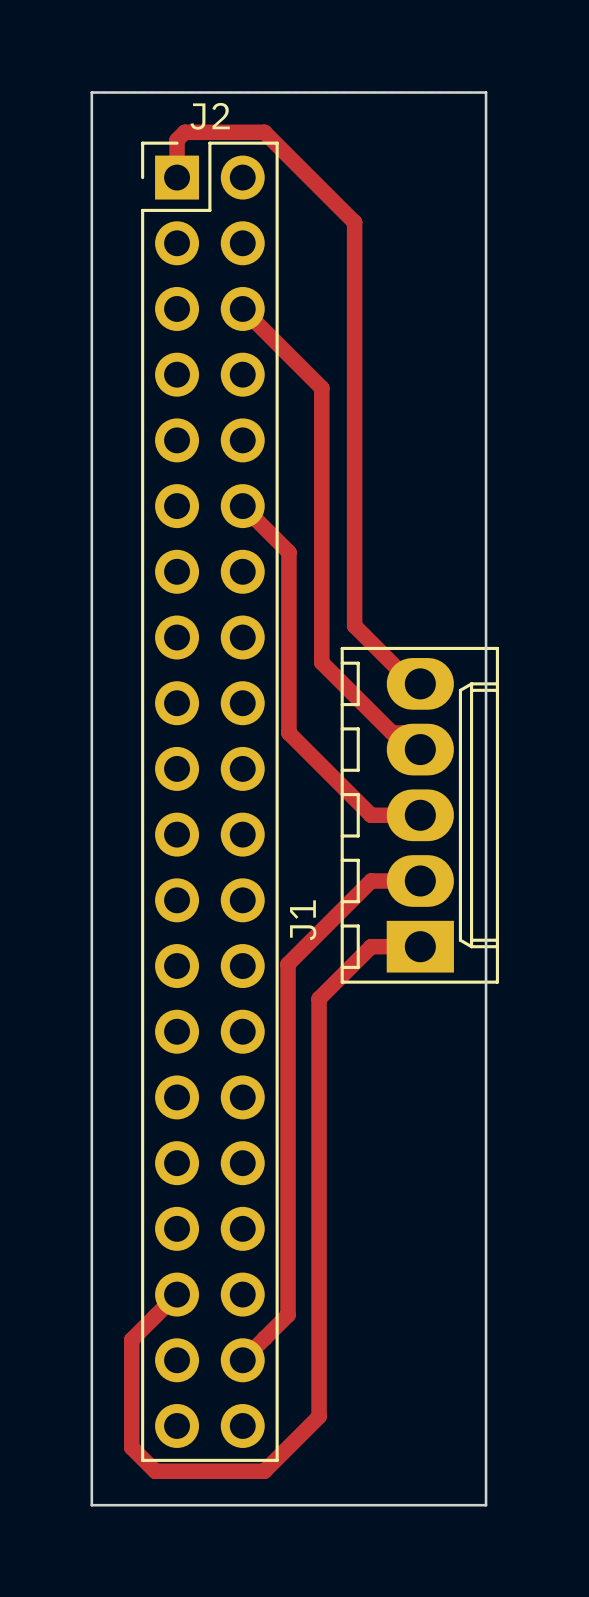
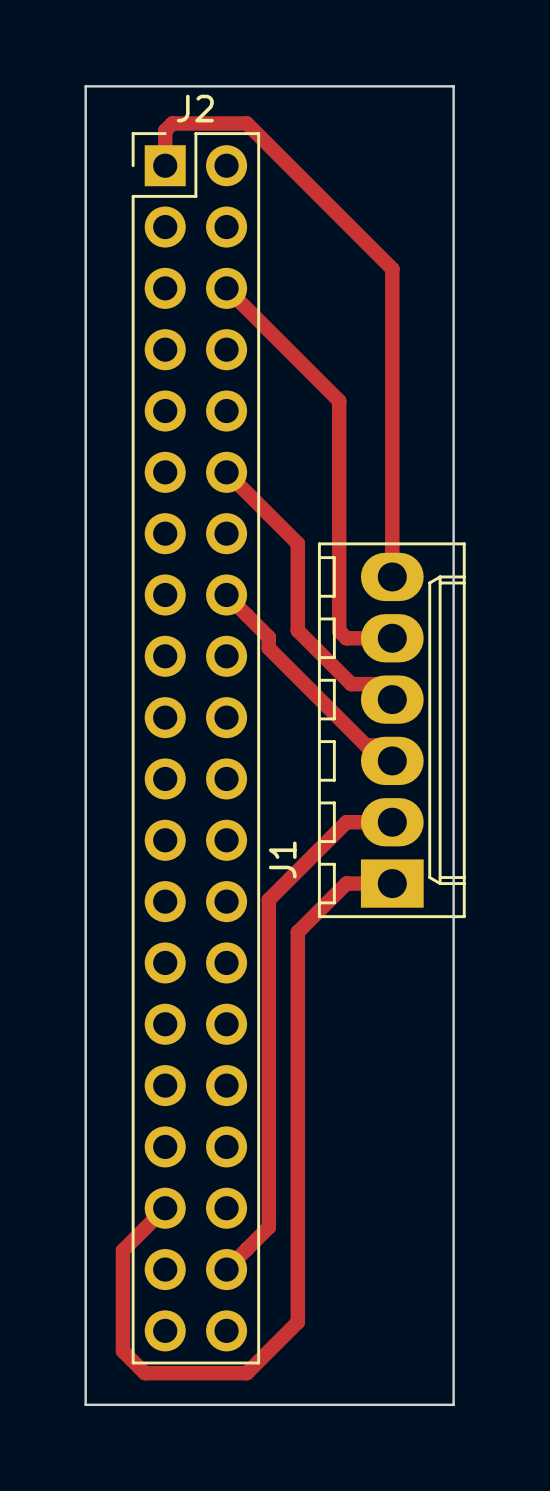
top track: (354, 222) (354, 625) (412, 683) -> (330, 207) (392, 268) (392, 576)
top track: (321, 388) (321, 662) (392, 733) -> (300, 362) (339, 401) (339, 631) (346, 638) (385, 638)
top track: (288, 552) (288, 733) (371, 815) (420, 815) -> (269, 515) (297, 543) (297, 630) (351, 684) (366, 684)
top track: none -> (226, 594) (268, 637) (268, 648) (366, 745) (376, 745) (392, 760)
J1 footprint: [340, 646, 499, 984] -> [317, 542, 466, 919]

